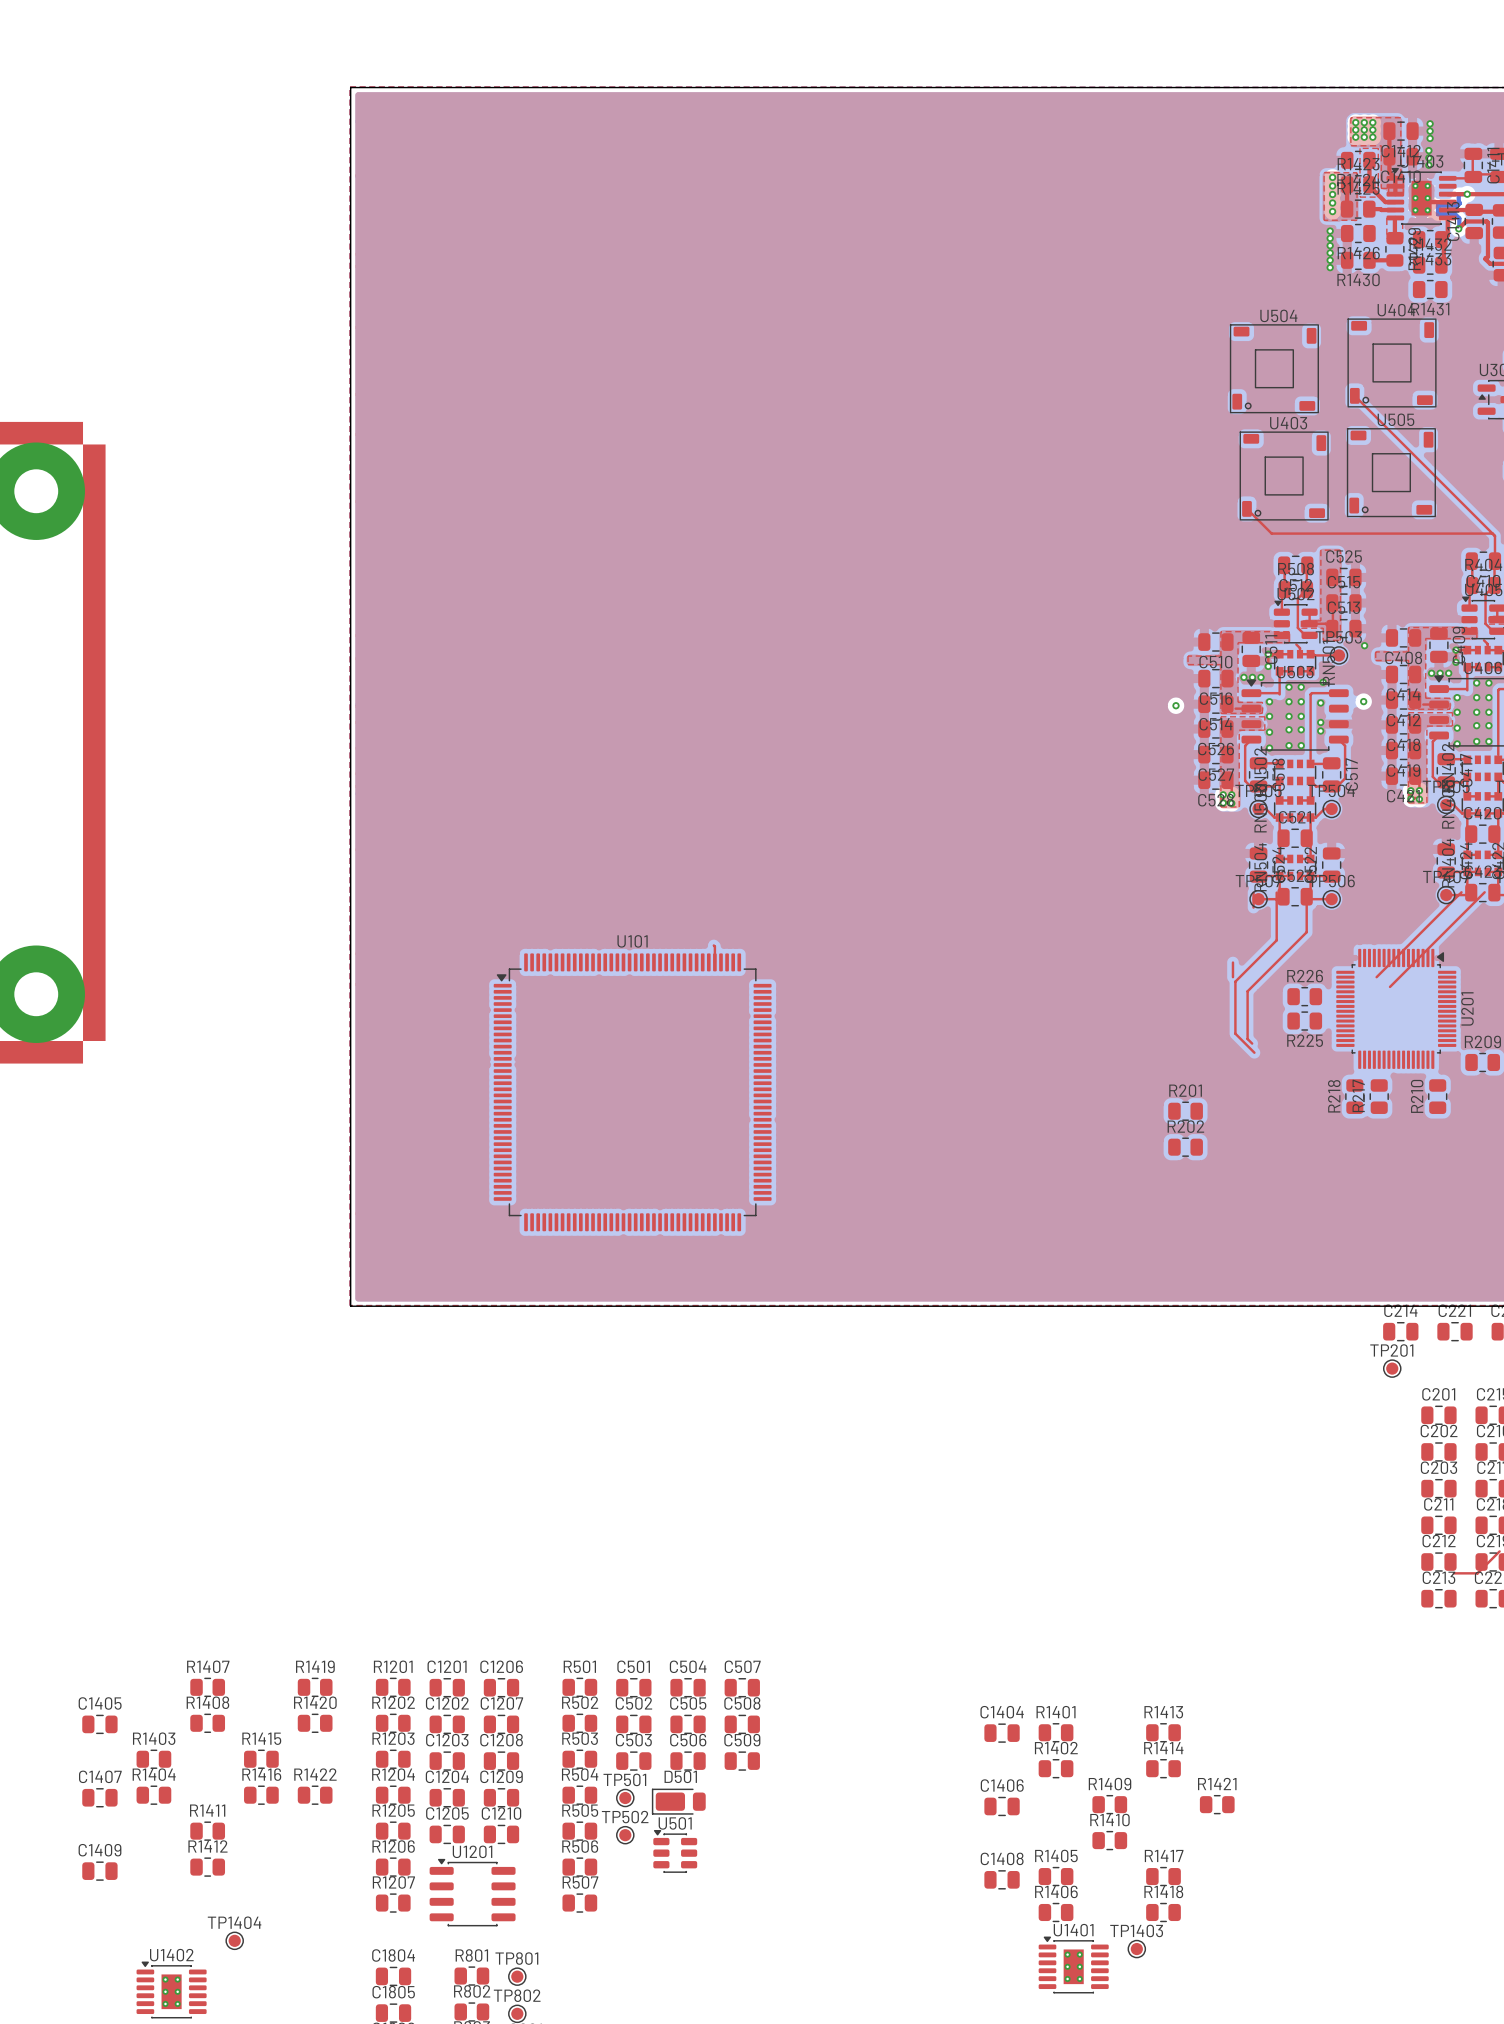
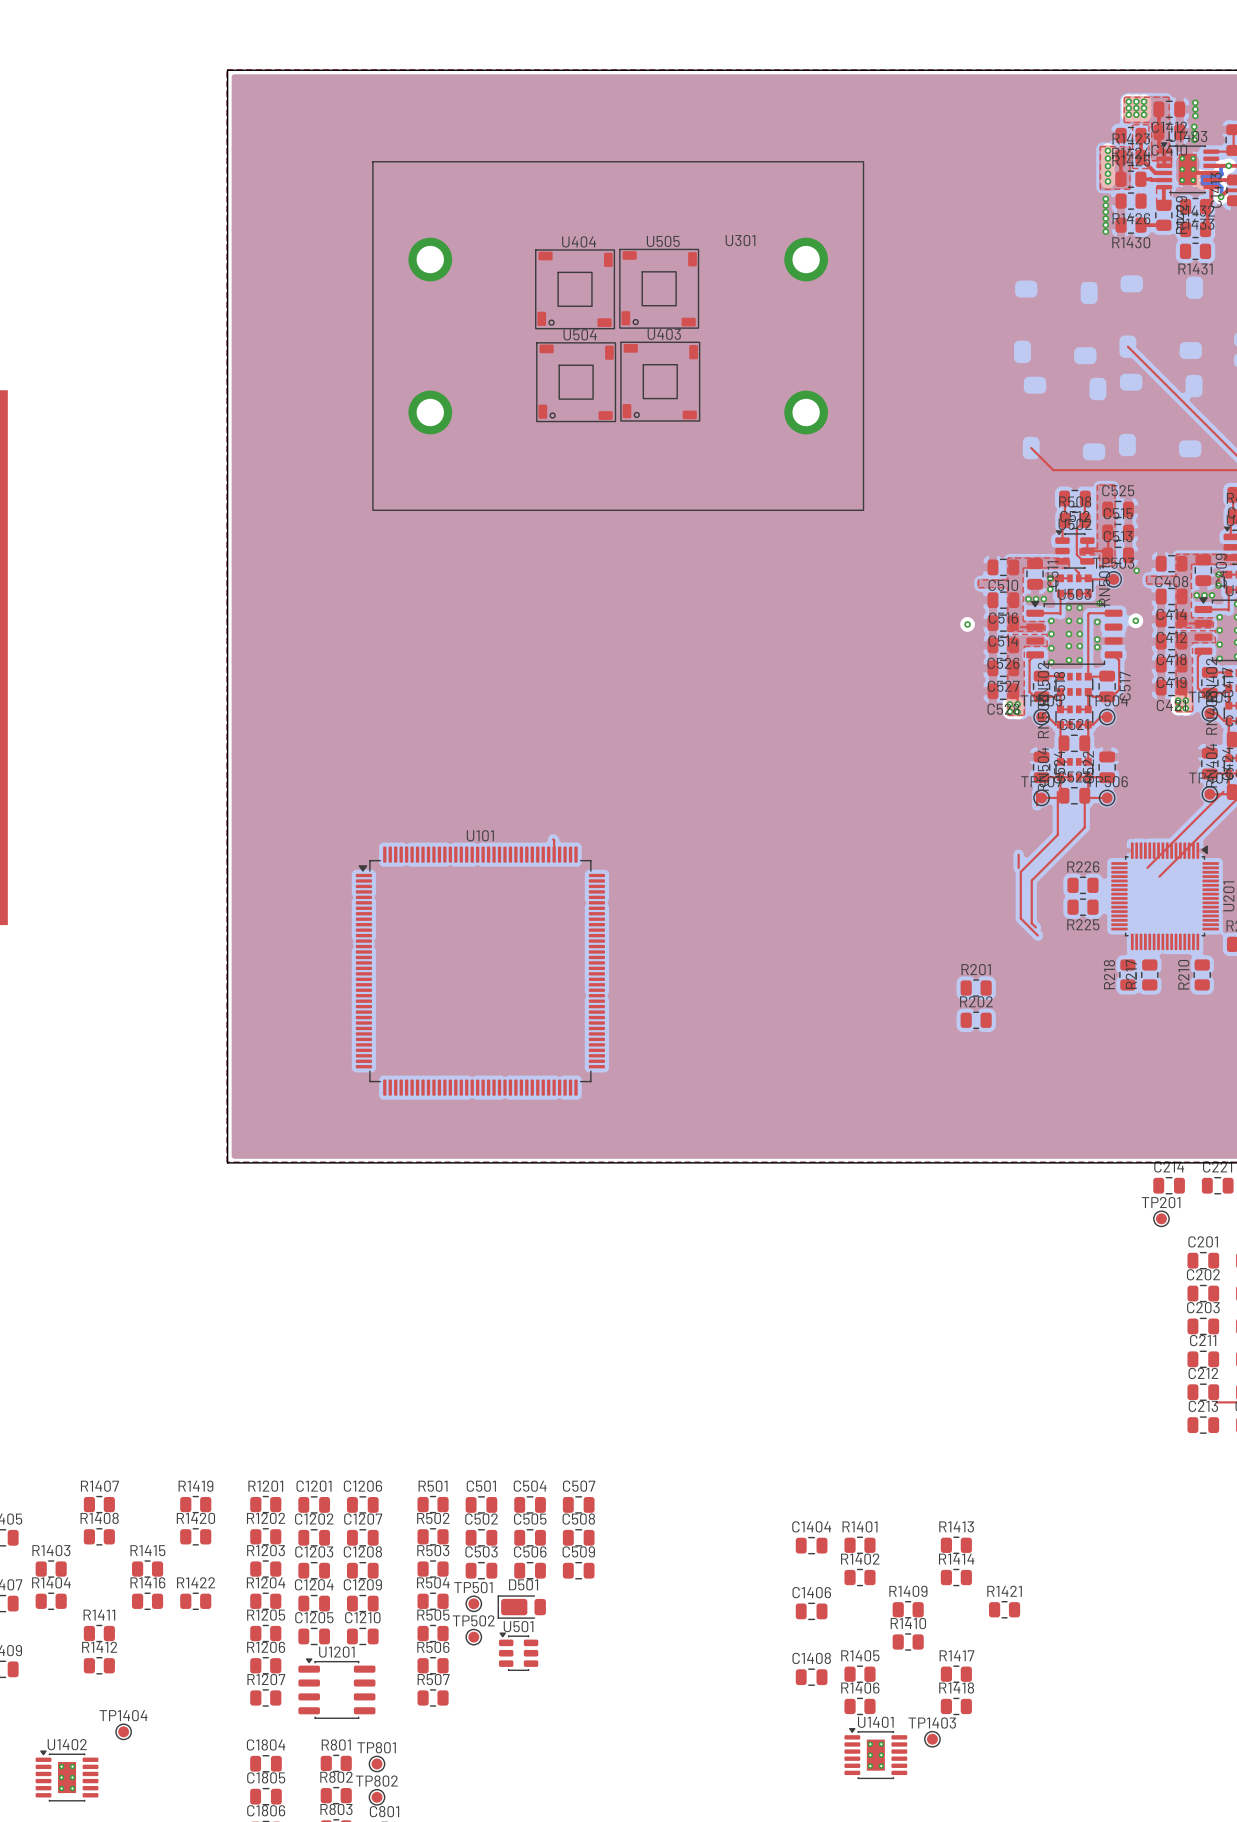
U404 position: (1392, 362) -> (575, 289)
U504 position: (1274, 368) -> (576, 382)
U301: none -> (618, 336)
U505 position: (1391, 472) -> (659, 288)
U403 position: (1284, 476) -> (660, 381)

